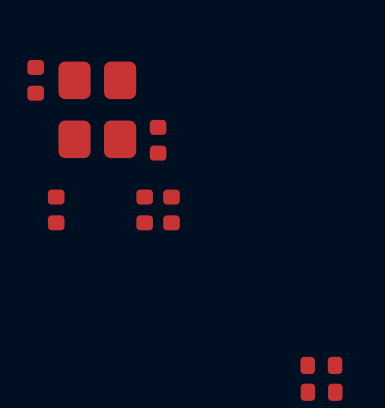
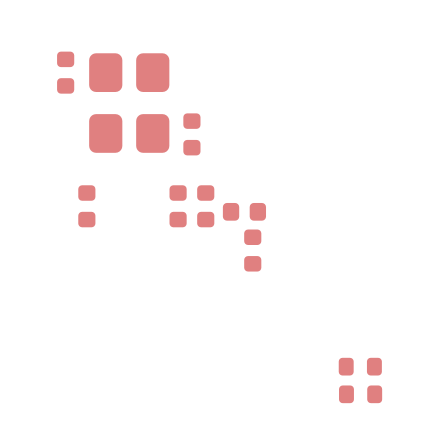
part: none -> (244, 211)
part: none -> (252, 250)

